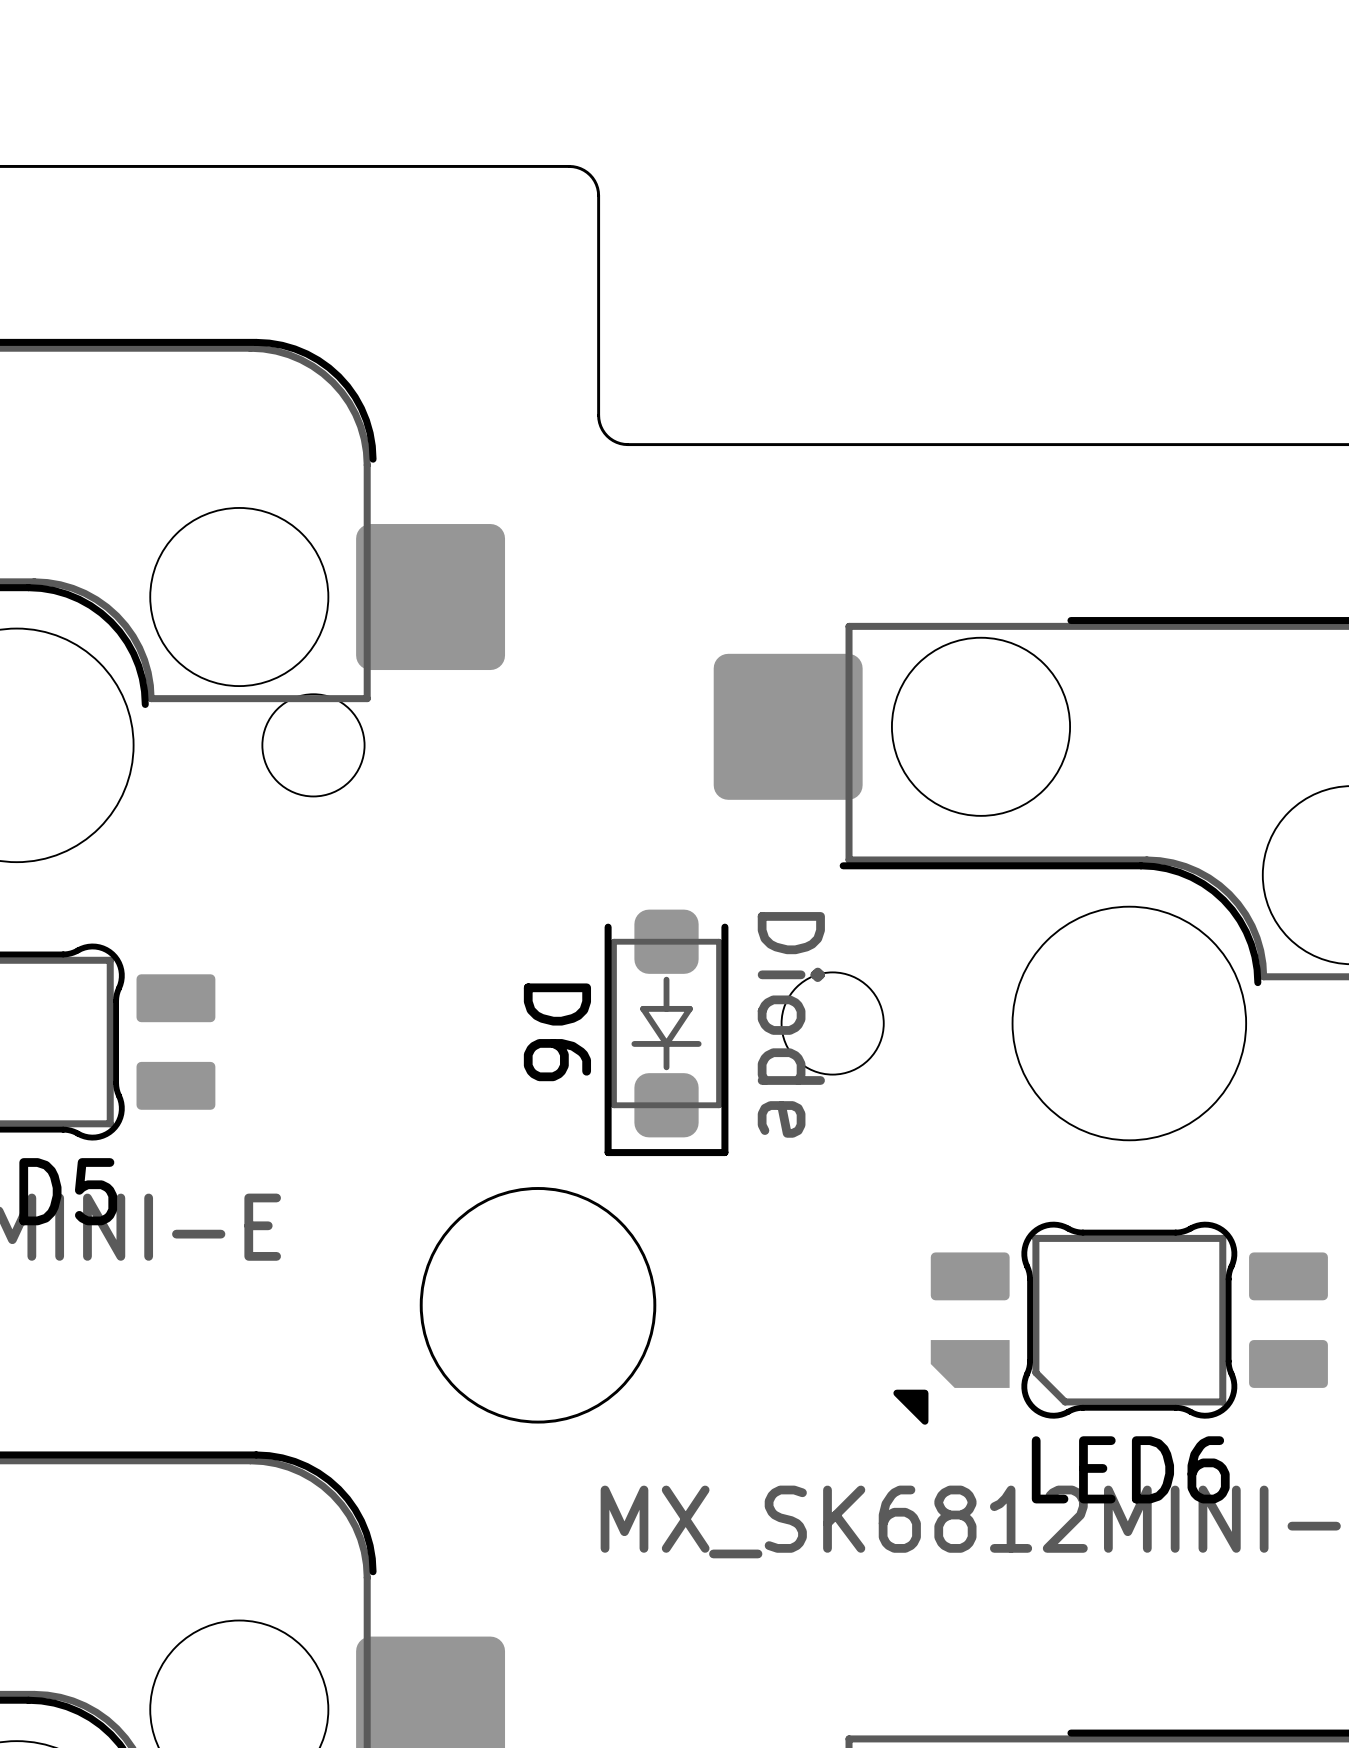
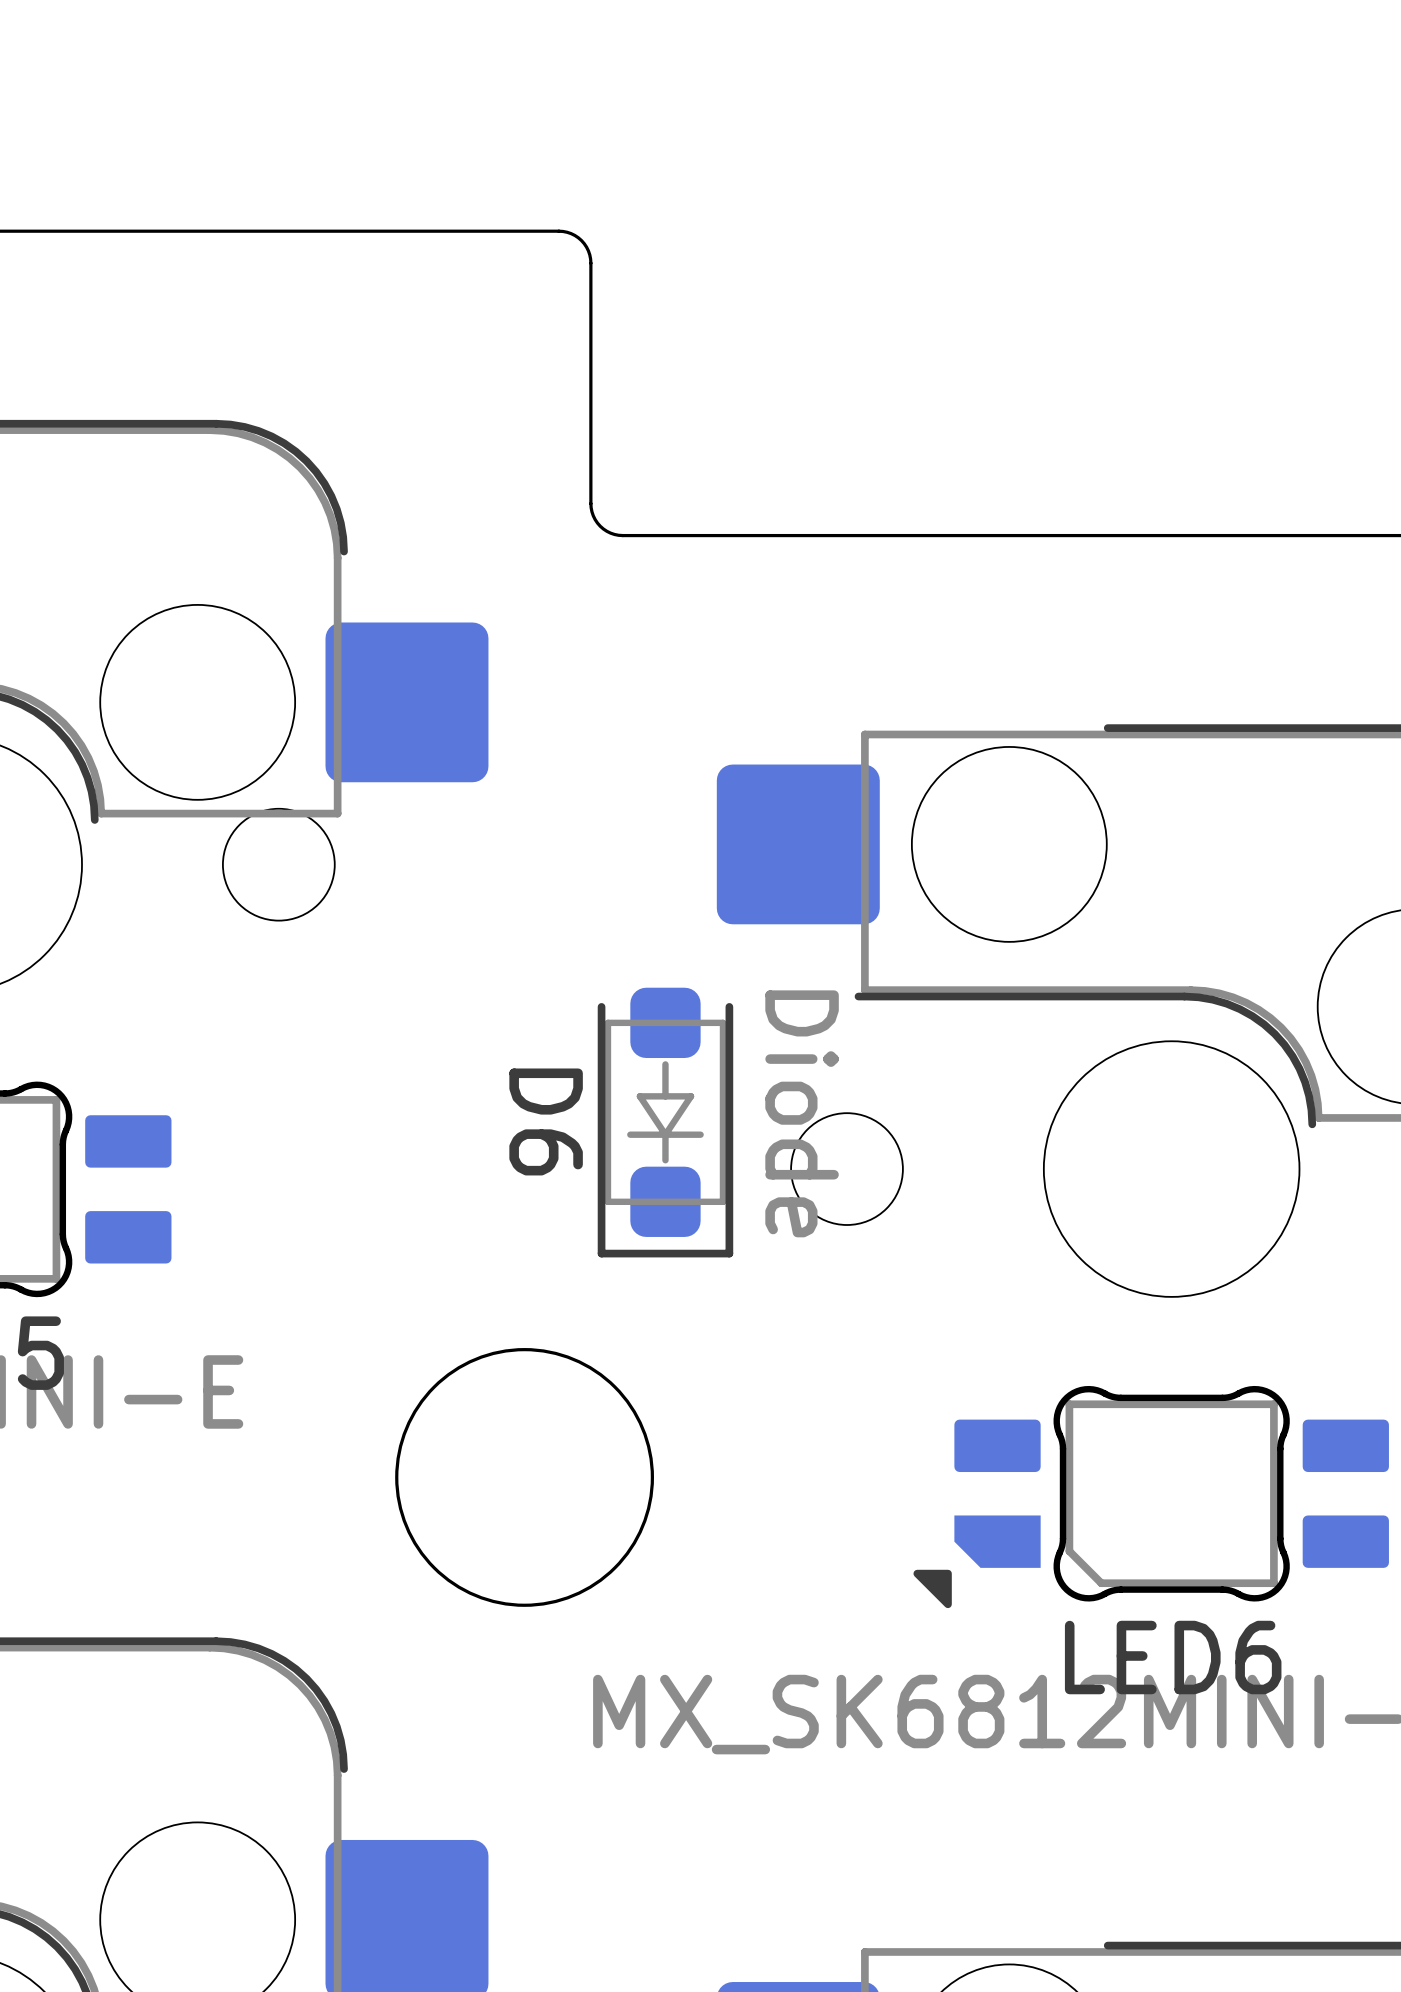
D6 position: (666, 1032) -> (665, 1122)

